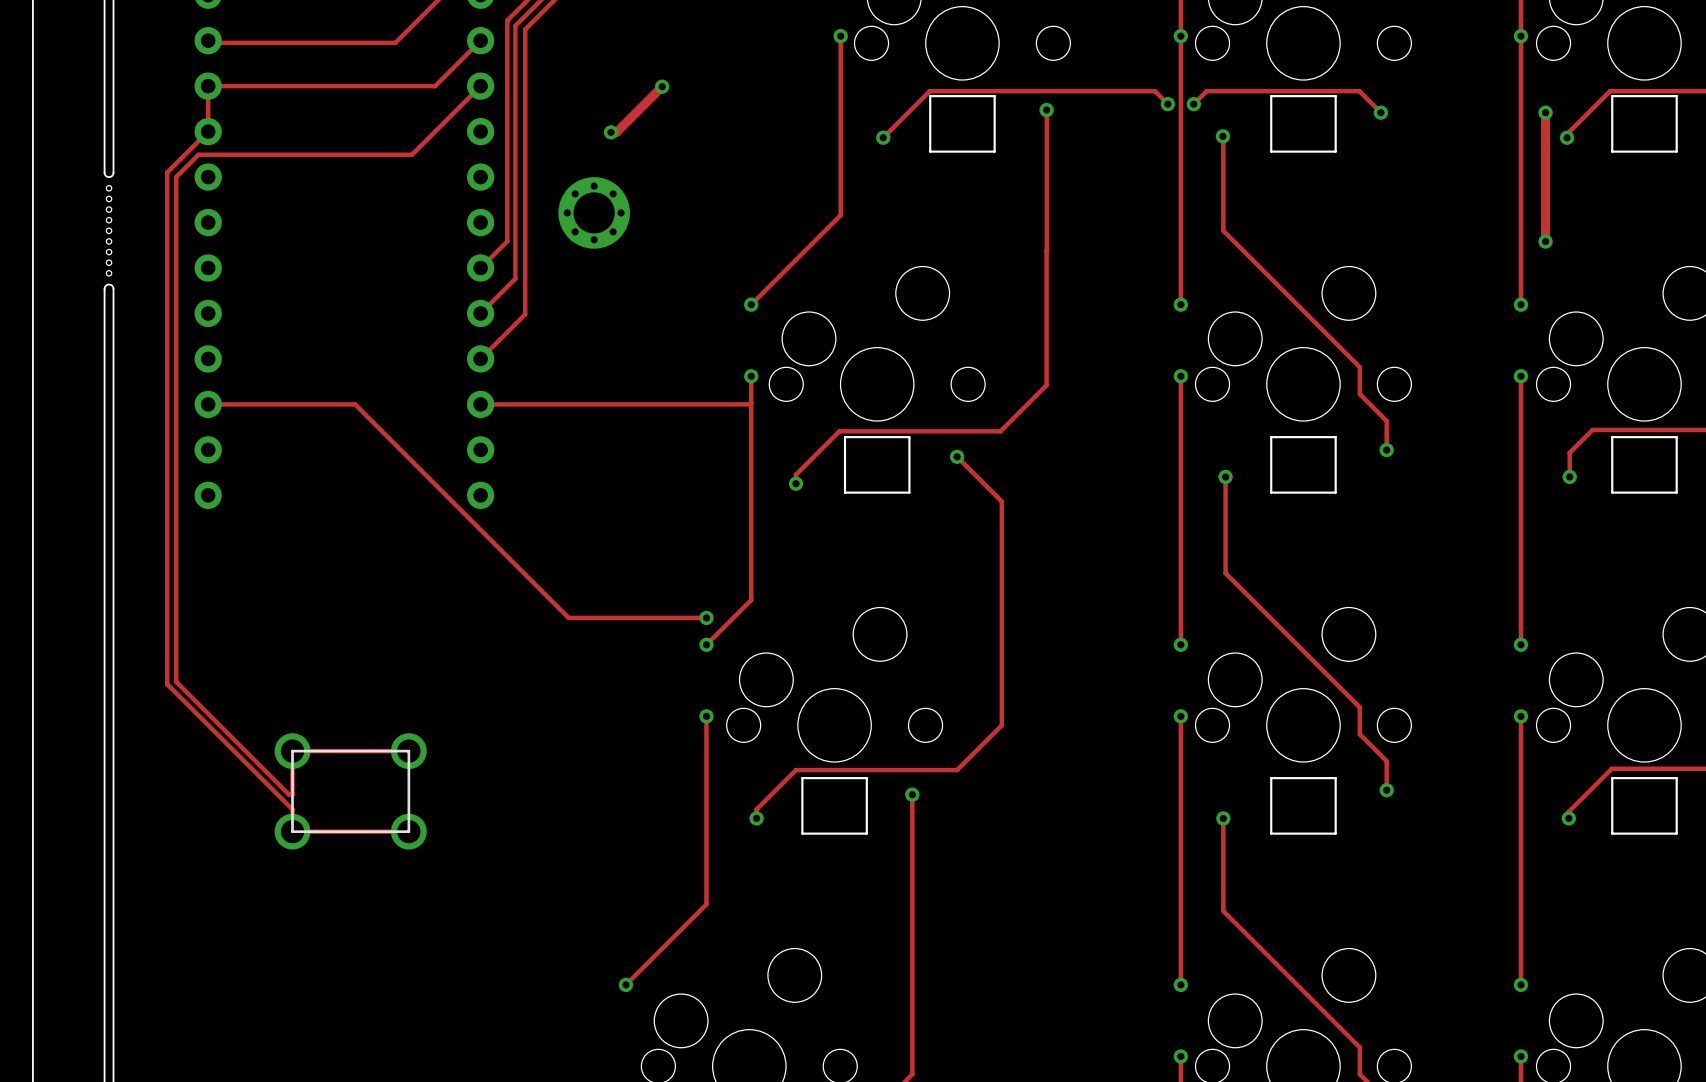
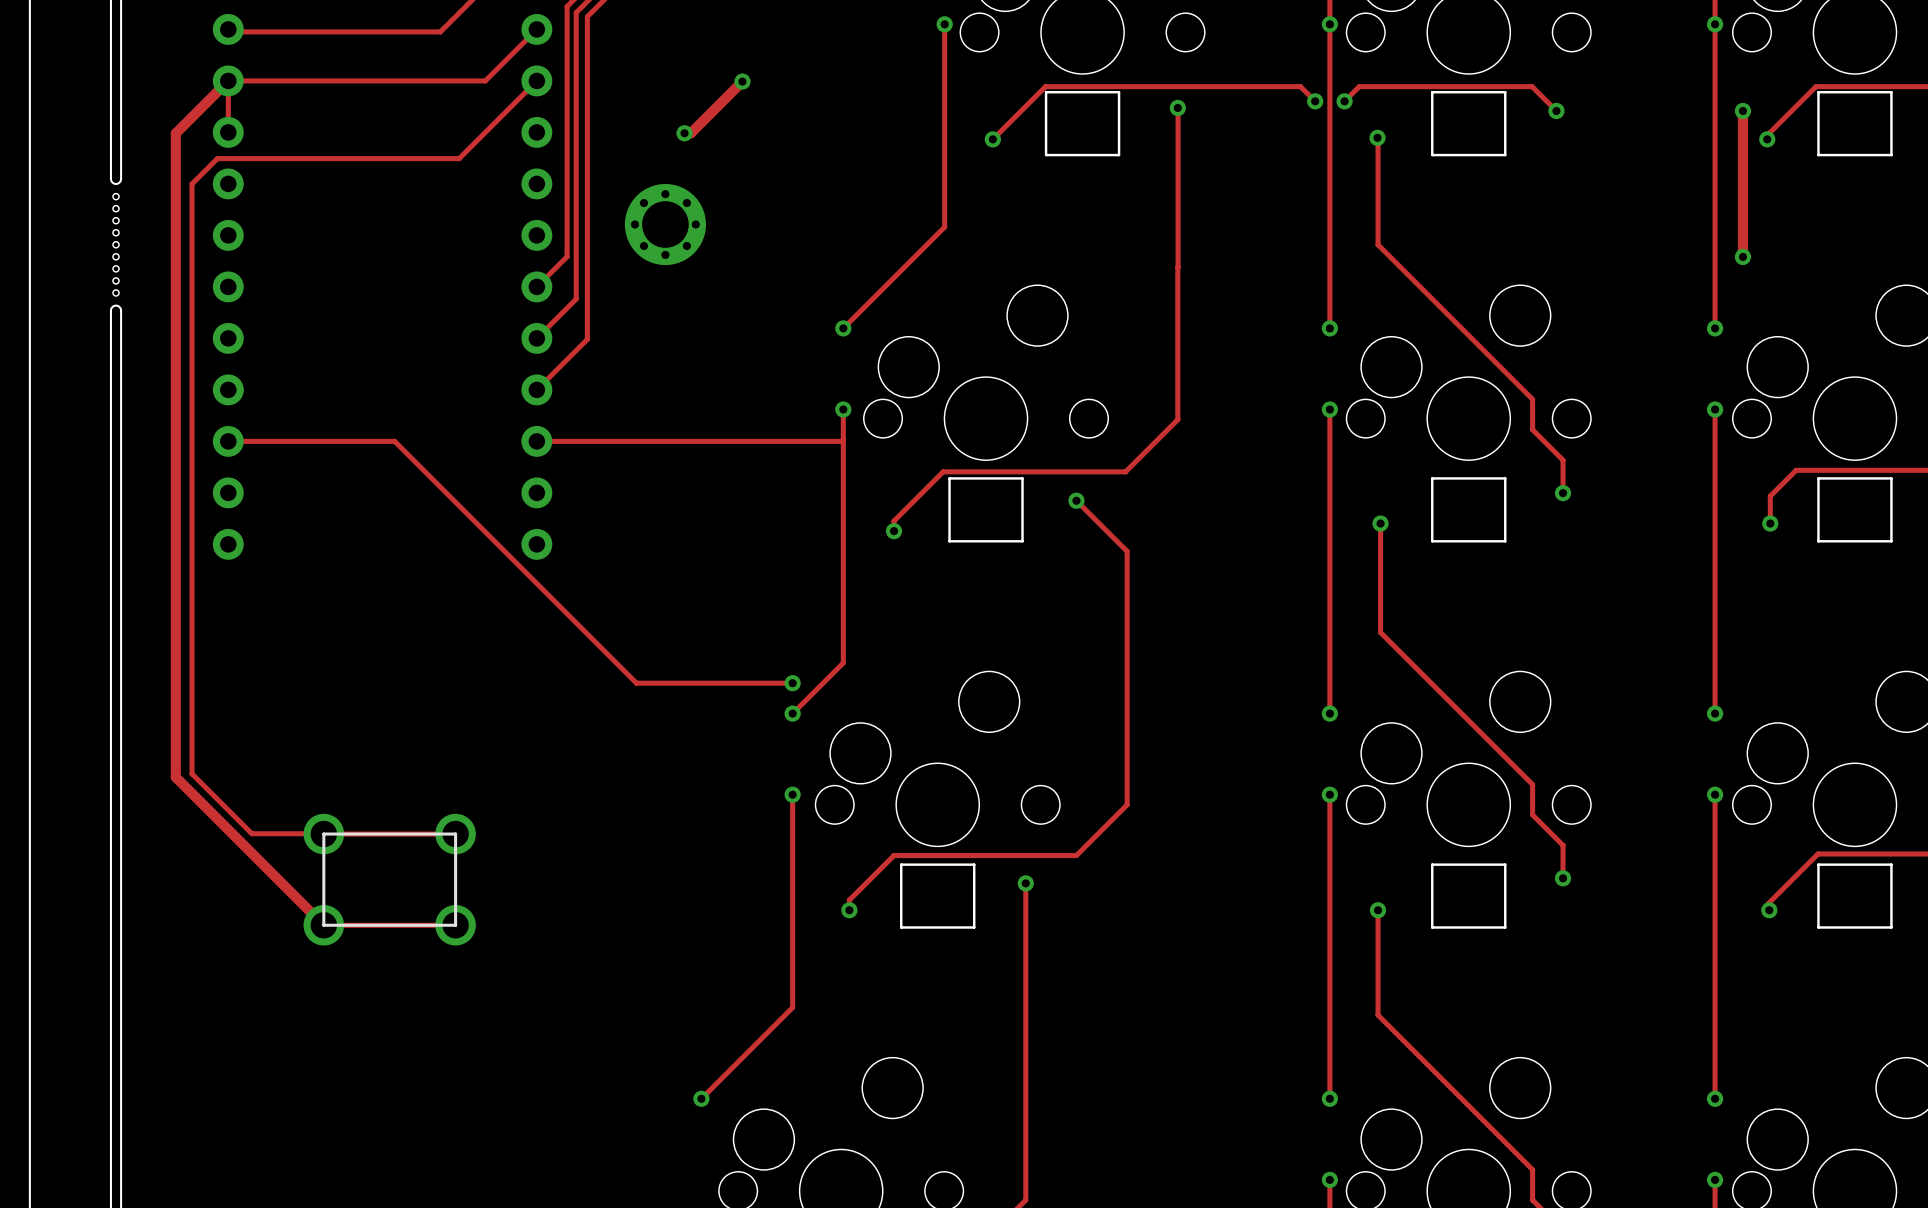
track: (208, 131) (167, 172) (167, 684) (292, 809) (292, 831) -> (228, 80) (175, 133) (175, 777) (323, 925)
track: (176, 681) (289, 794) (292, 794) (292, 751) -> (192, 755) (192, 773) (251, 833) (323, 834)

